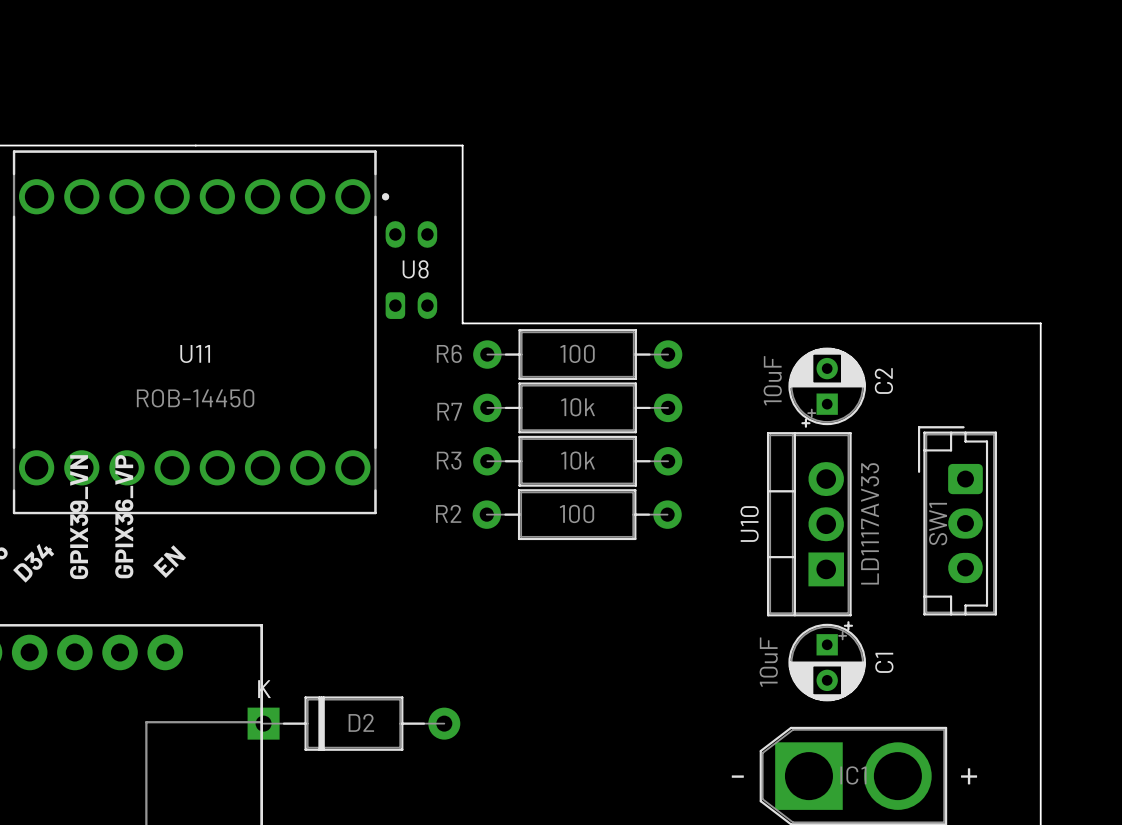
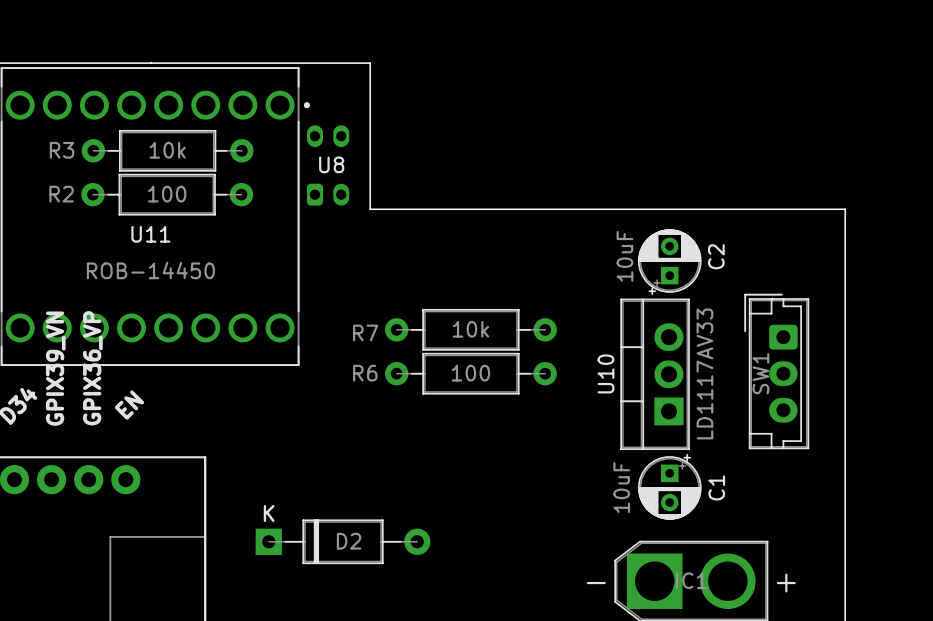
R6 position: (577, 354) -> (470, 373)
R7 position: (577, 407) -> (470, 329)
R3 position: (577, 461) -> (167, 150)
R2 position: (577, 514) -> (167, 194)
D2 position: (353, 723) -> (343, 541)

